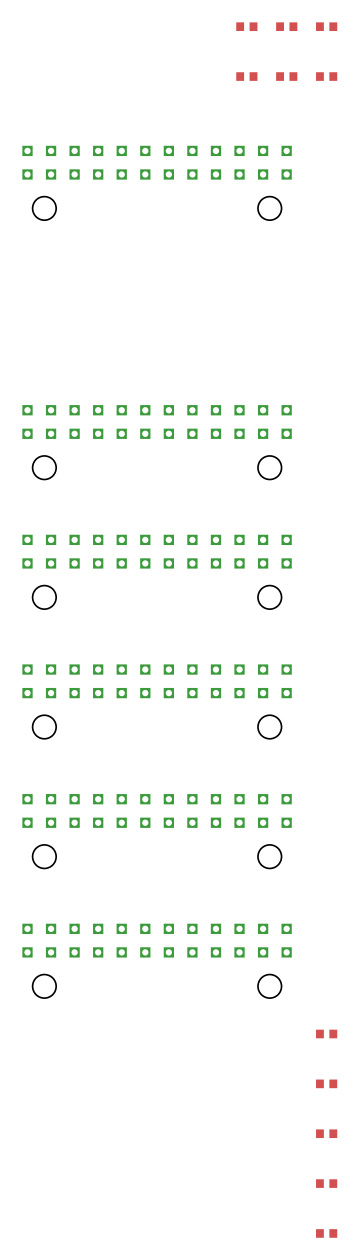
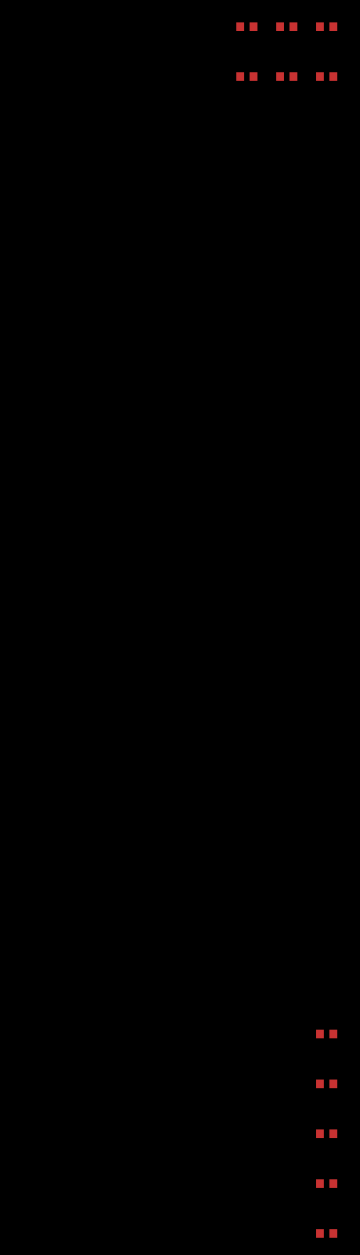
part: (157, 182) -> none
part: (157, 442) -> none
part: (157, 571) -> none
part: (157, 701) -> none
part: (157, 831) -> none
part: (157, 960) -> none

